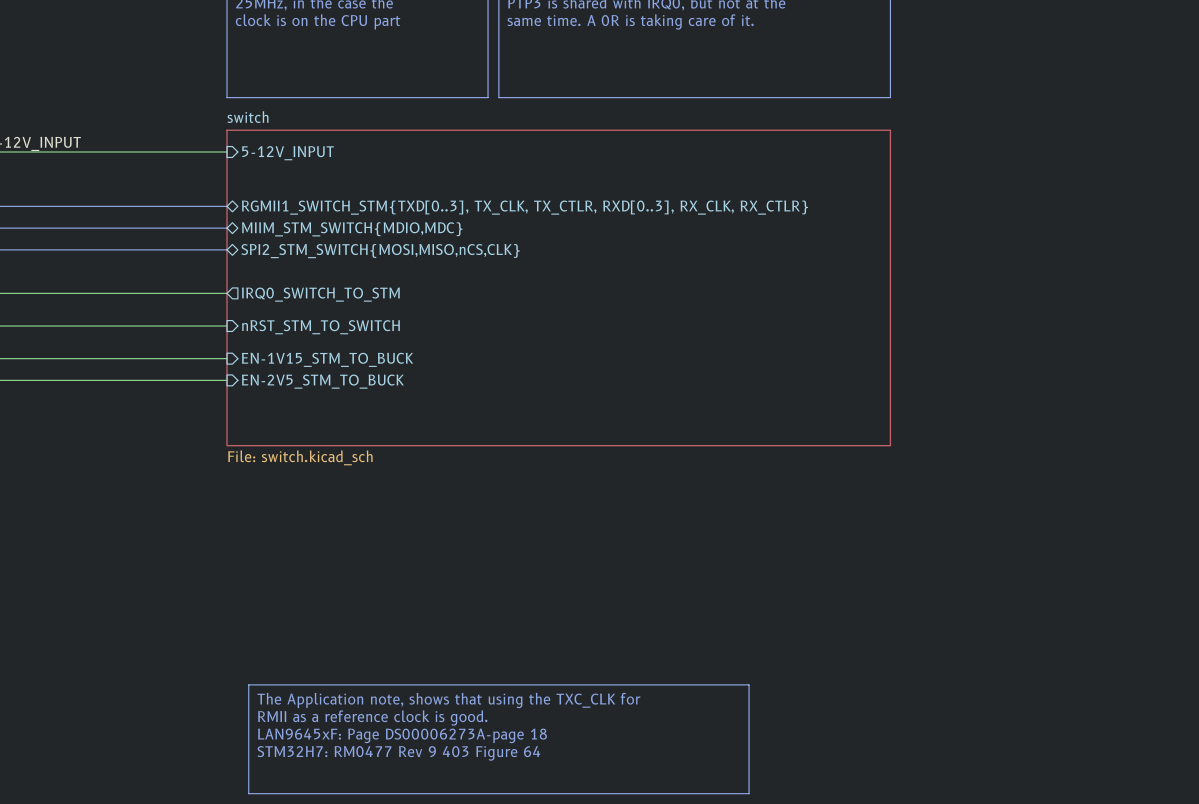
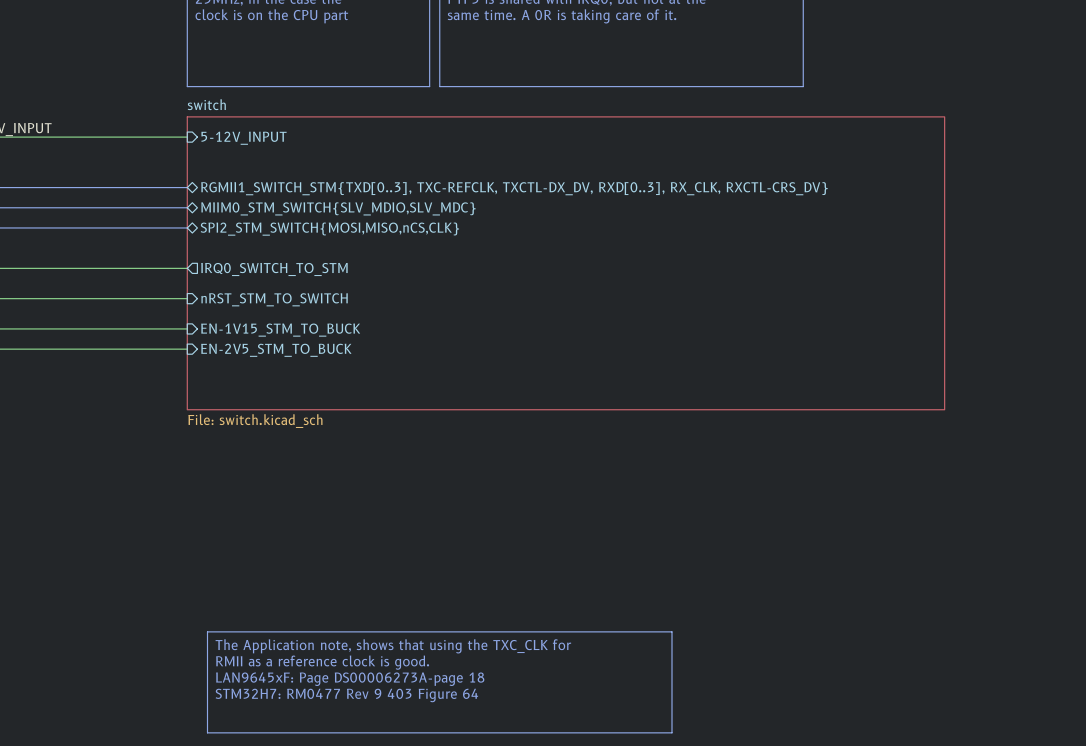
sheet pin: RGMII1_SWITCH_STM{TXD[0..3], TX_CLK, TX_CTLR, RXD[0..3], RX_CLK, RX_CTLR} (524, 207) -> RGMII1_SWITCH_STM{TXD[0..3], TXC-REFCLK, TXCTL-DX_DV, RXD[0..3], RX_CLK, RXCTL-CRS_DV} (514, 188)
sheet pin: MIIM_STM_SWITCH{MDIO,MDC} (352, 229) -> MIIM0_STM_SWITCH{SLV_MDIO,SLV_MDC} (338, 208)
sheet switch: File: switch.kicad_sch (558, 287) -> none
sheet switch: none -> File: switch.kicad_sch (565, 263)

